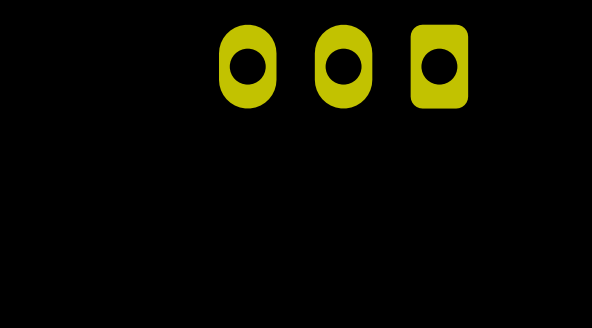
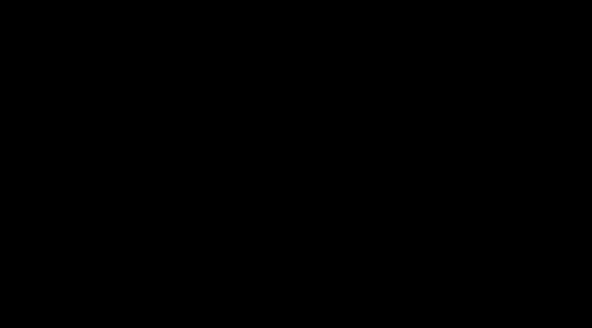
part: (343, 66) -> none

